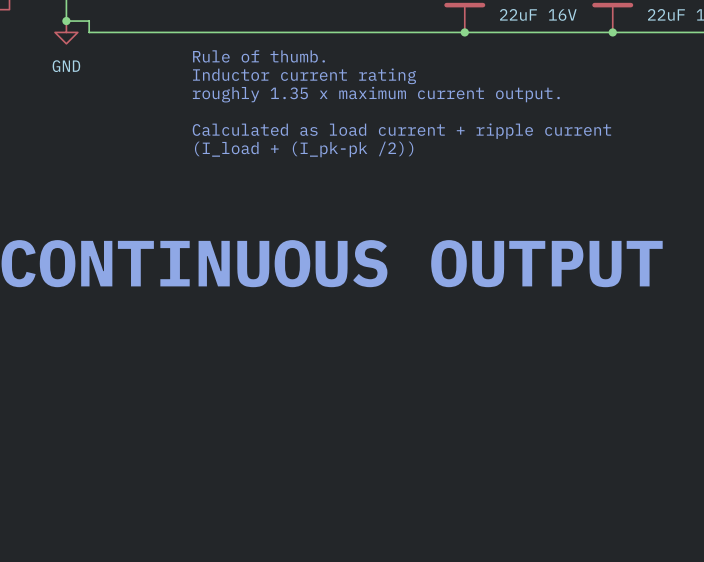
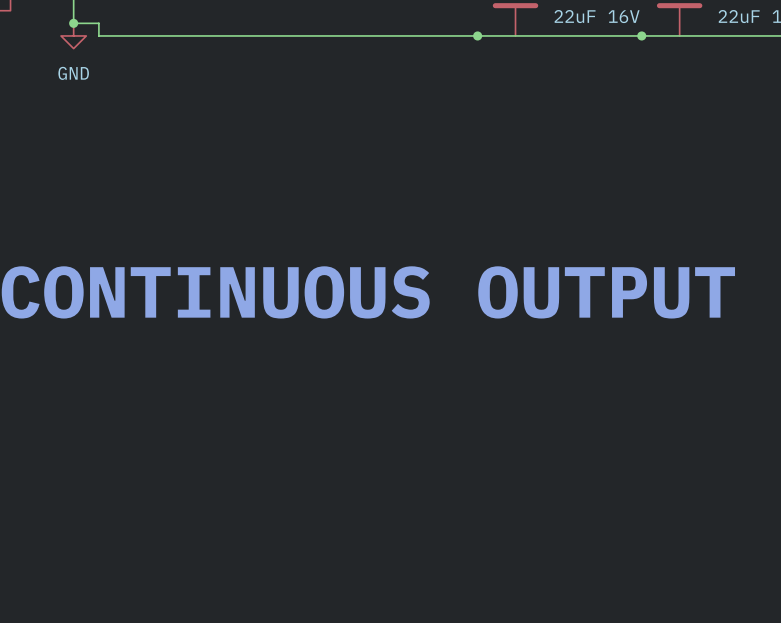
junction position: (464, 32) -> (477, 35)
junction position: (612, 32) -> (641, 35)
text: Rule of thumb. (258, 56) -> none
text: Inductor current rating (304, 76) -> none
text: roughly 1.35 x maximum current output. (376, 94) -> none
text: Calculated as load current + ripple current (401, 131) -> none
text: (I_load + (I_pk-pk /2)) (304, 149) -> none

